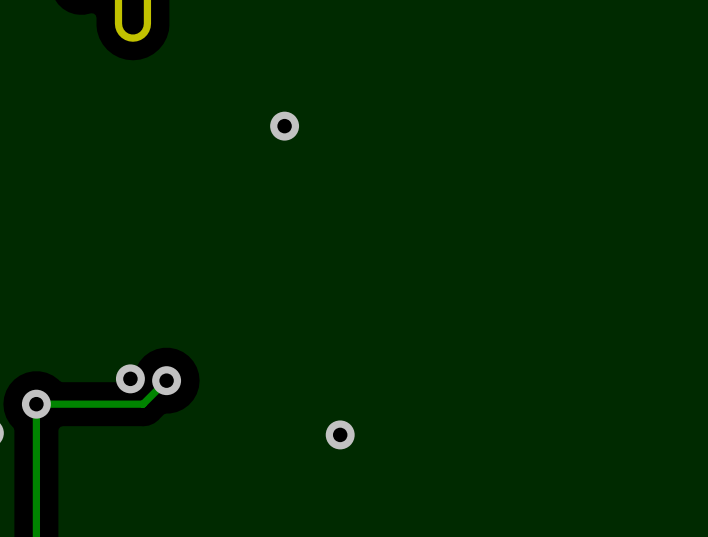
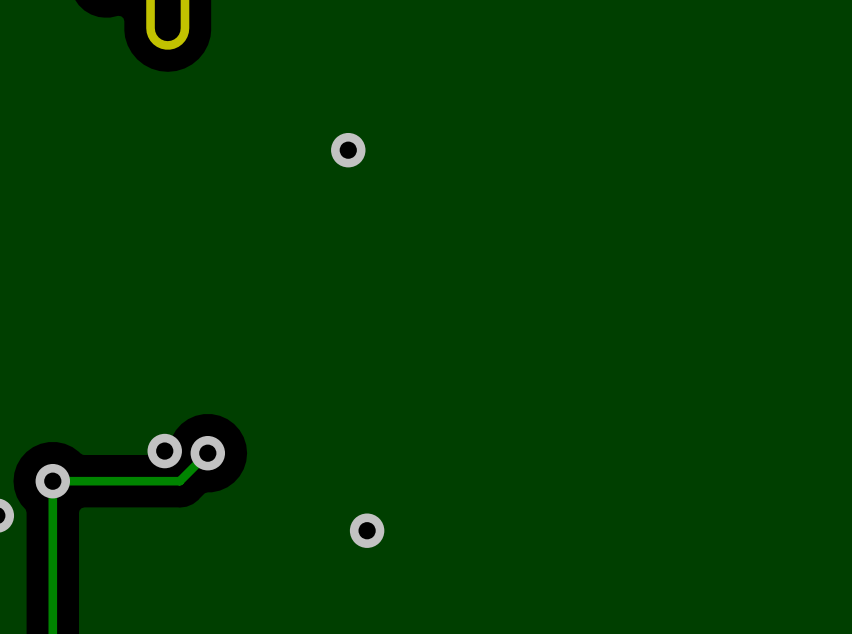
via position: (340, 434) -> (367, 530)

